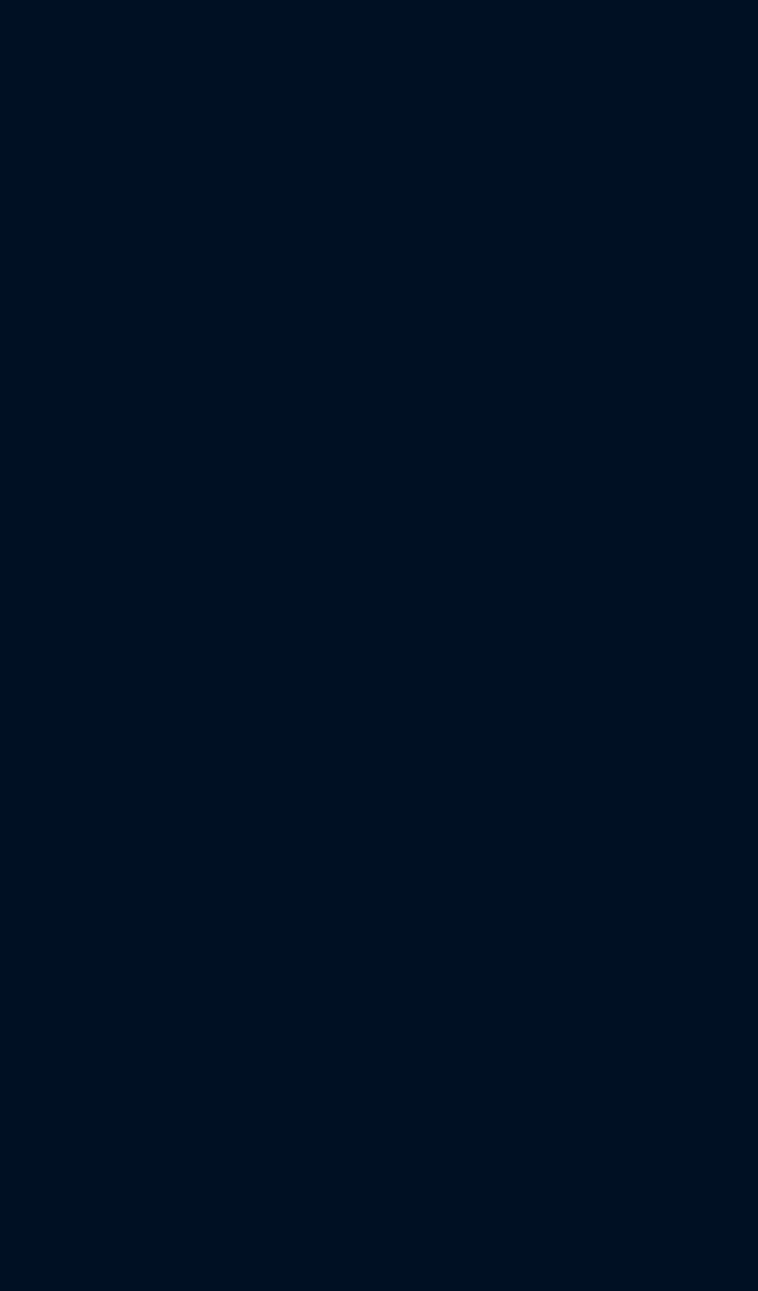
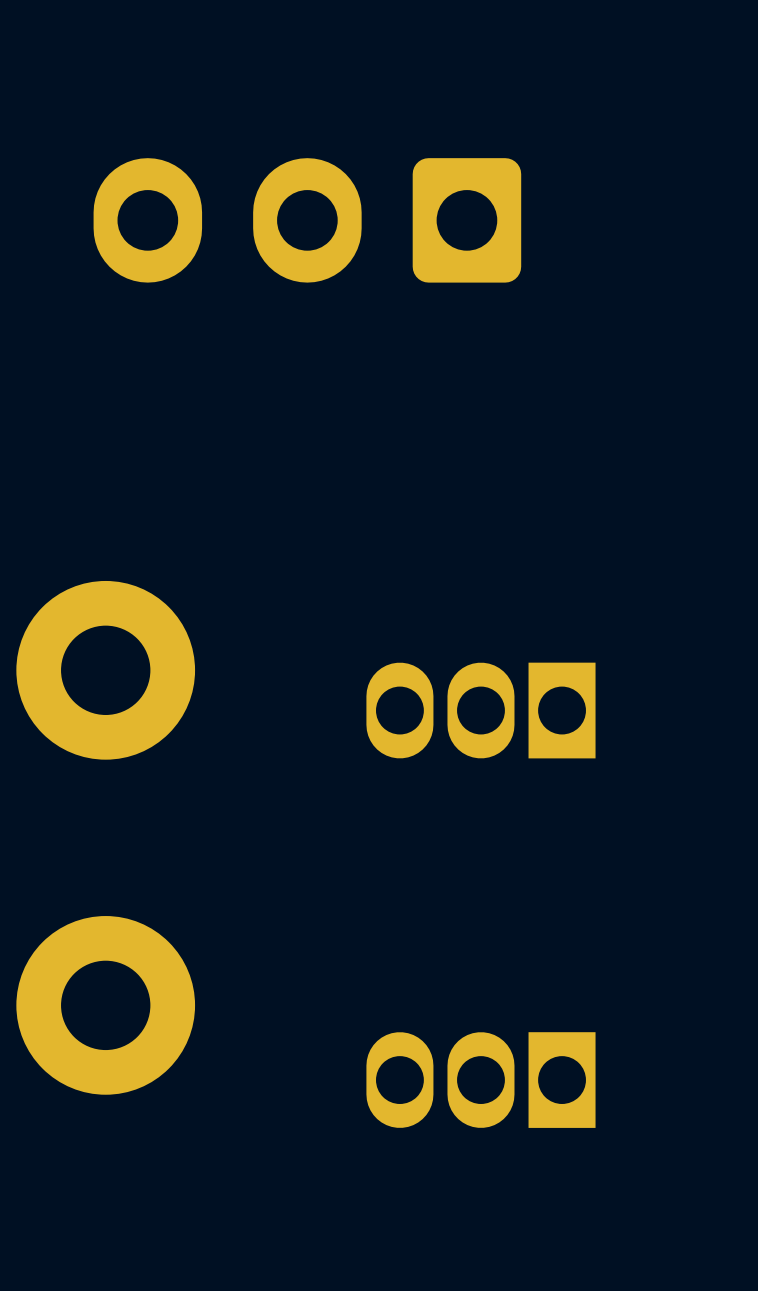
part: none -> (307, 220)
part: none -> (105, 670)
part: none -> (480, 710)
part: none -> (105, 1005)
part: none -> (480, 1080)

